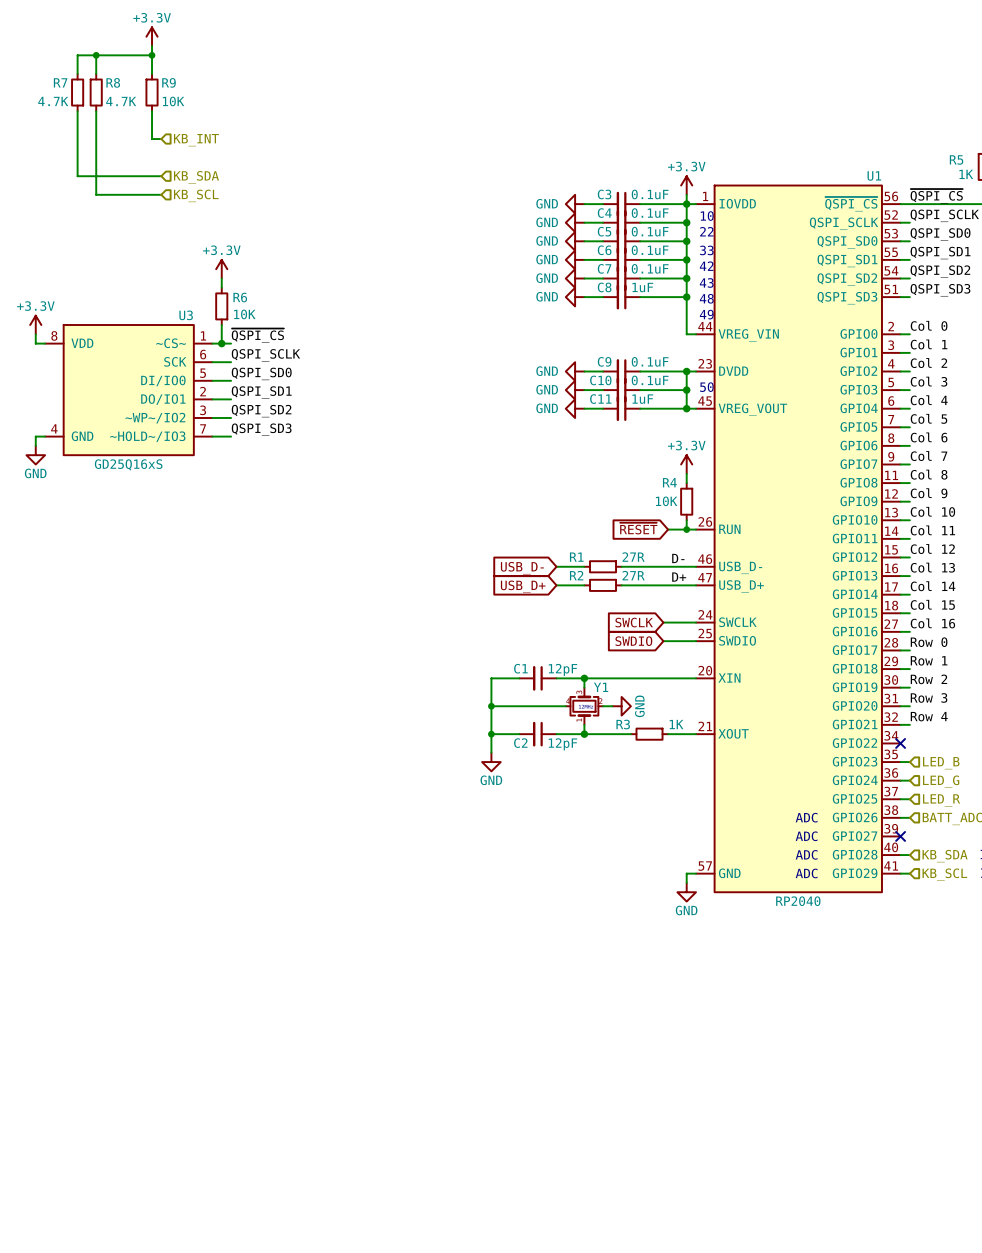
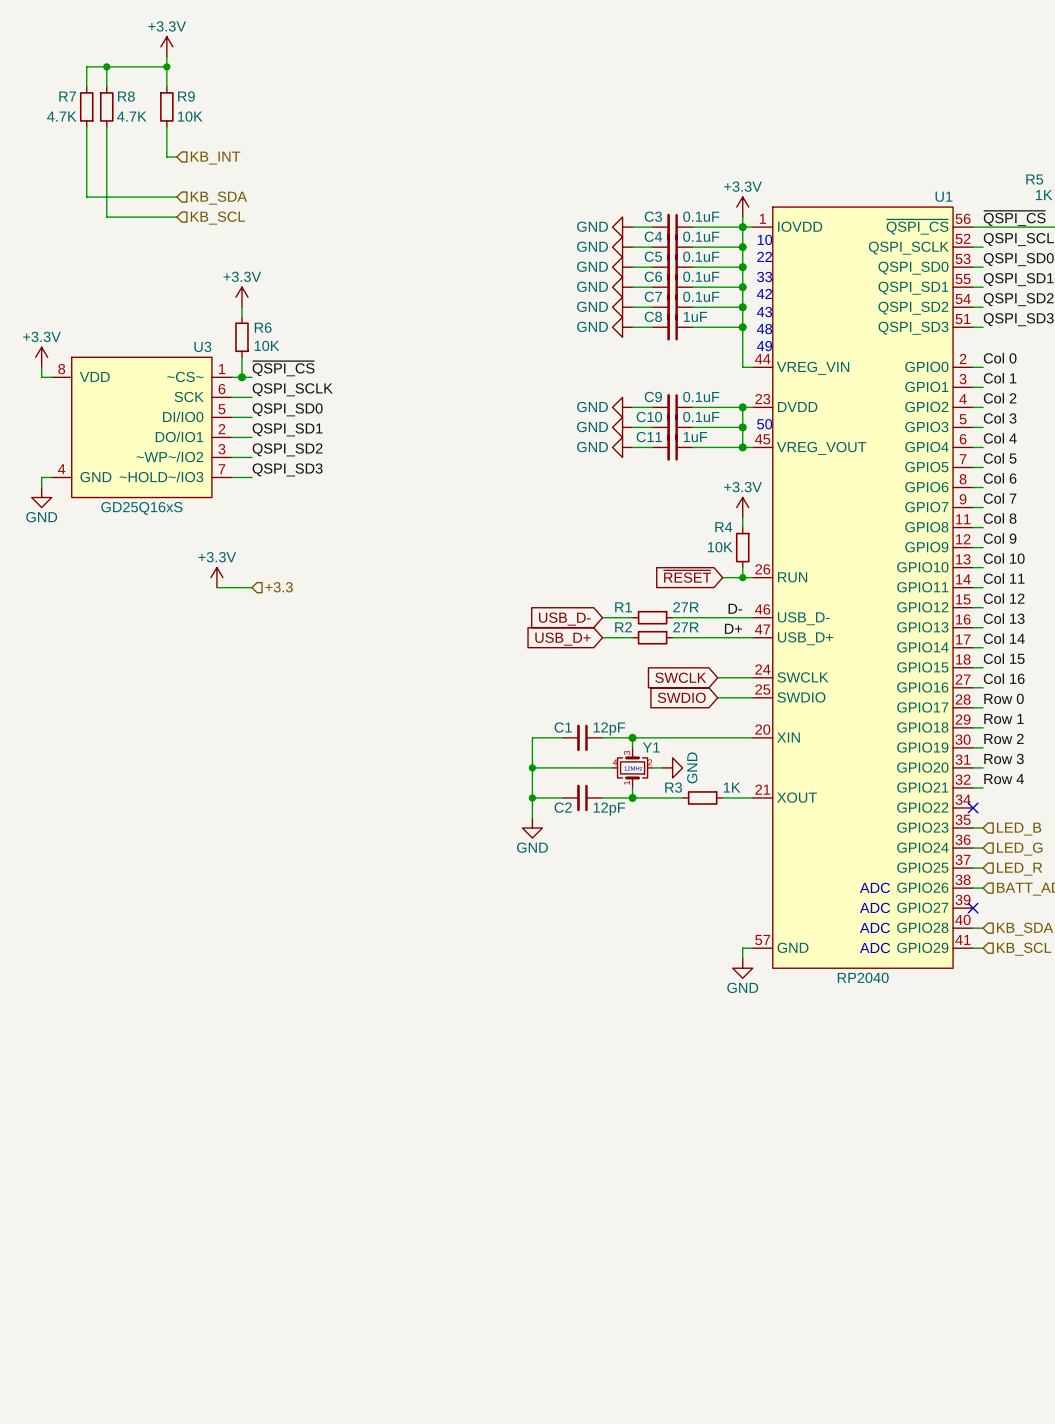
power symbol: none -> +3.3V (216, 577)
wire: none -> (216, 587) (251, 587)
hierarchical label: none -> +3.3 (279, 587)

